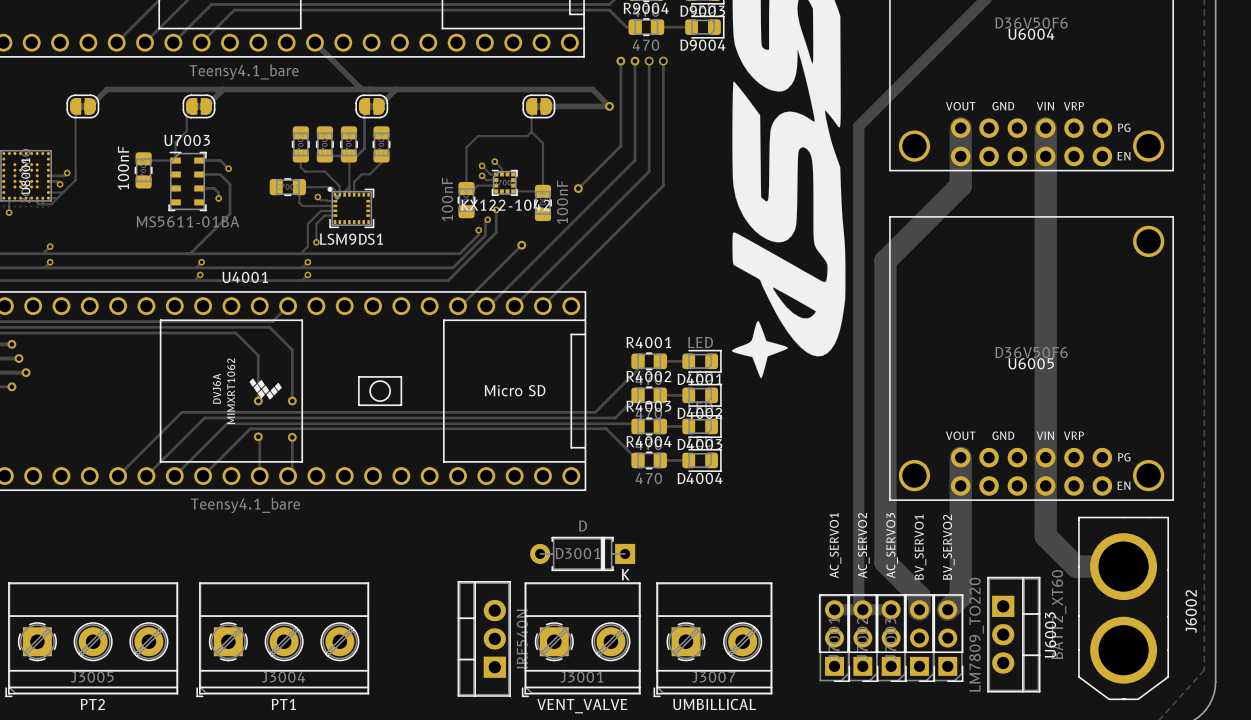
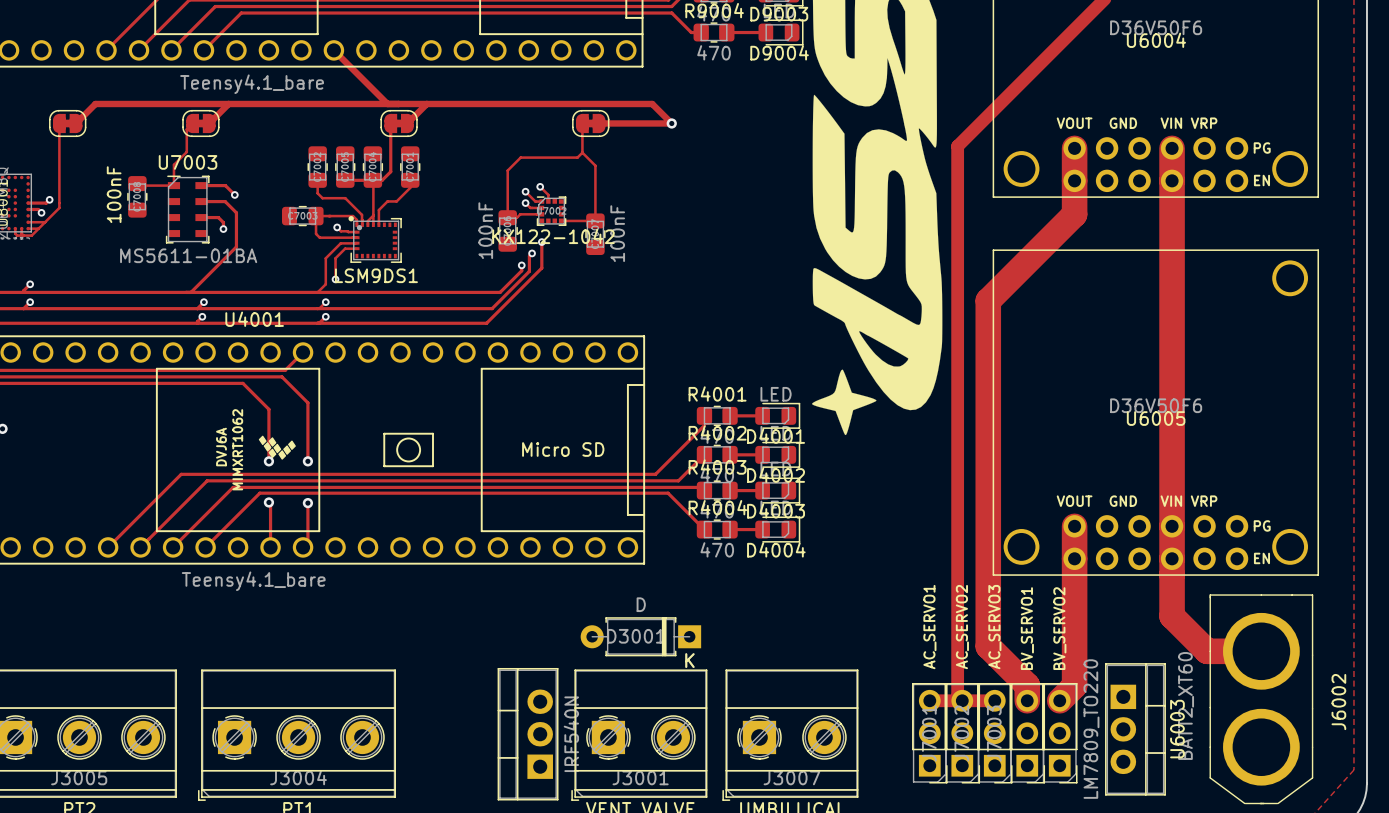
track: (620, 61) (620, 146) (578, 188) -> none
via: (620, 61) -> none
track: (635, 61) (635, 160) (493, 301) -> none
via: (635, 61) -> none
track: (649, 61) (649, 171) (514, 306) -> none
via: (649, 61) -> none
track: (663, 61) (663, 185) (542, 306) -> none
via: (663, 61) -> none
via: (578, 188) -> none
track: (521, 245) (460, 306) (458, 306) -> none
via: (521, 245) -> none

